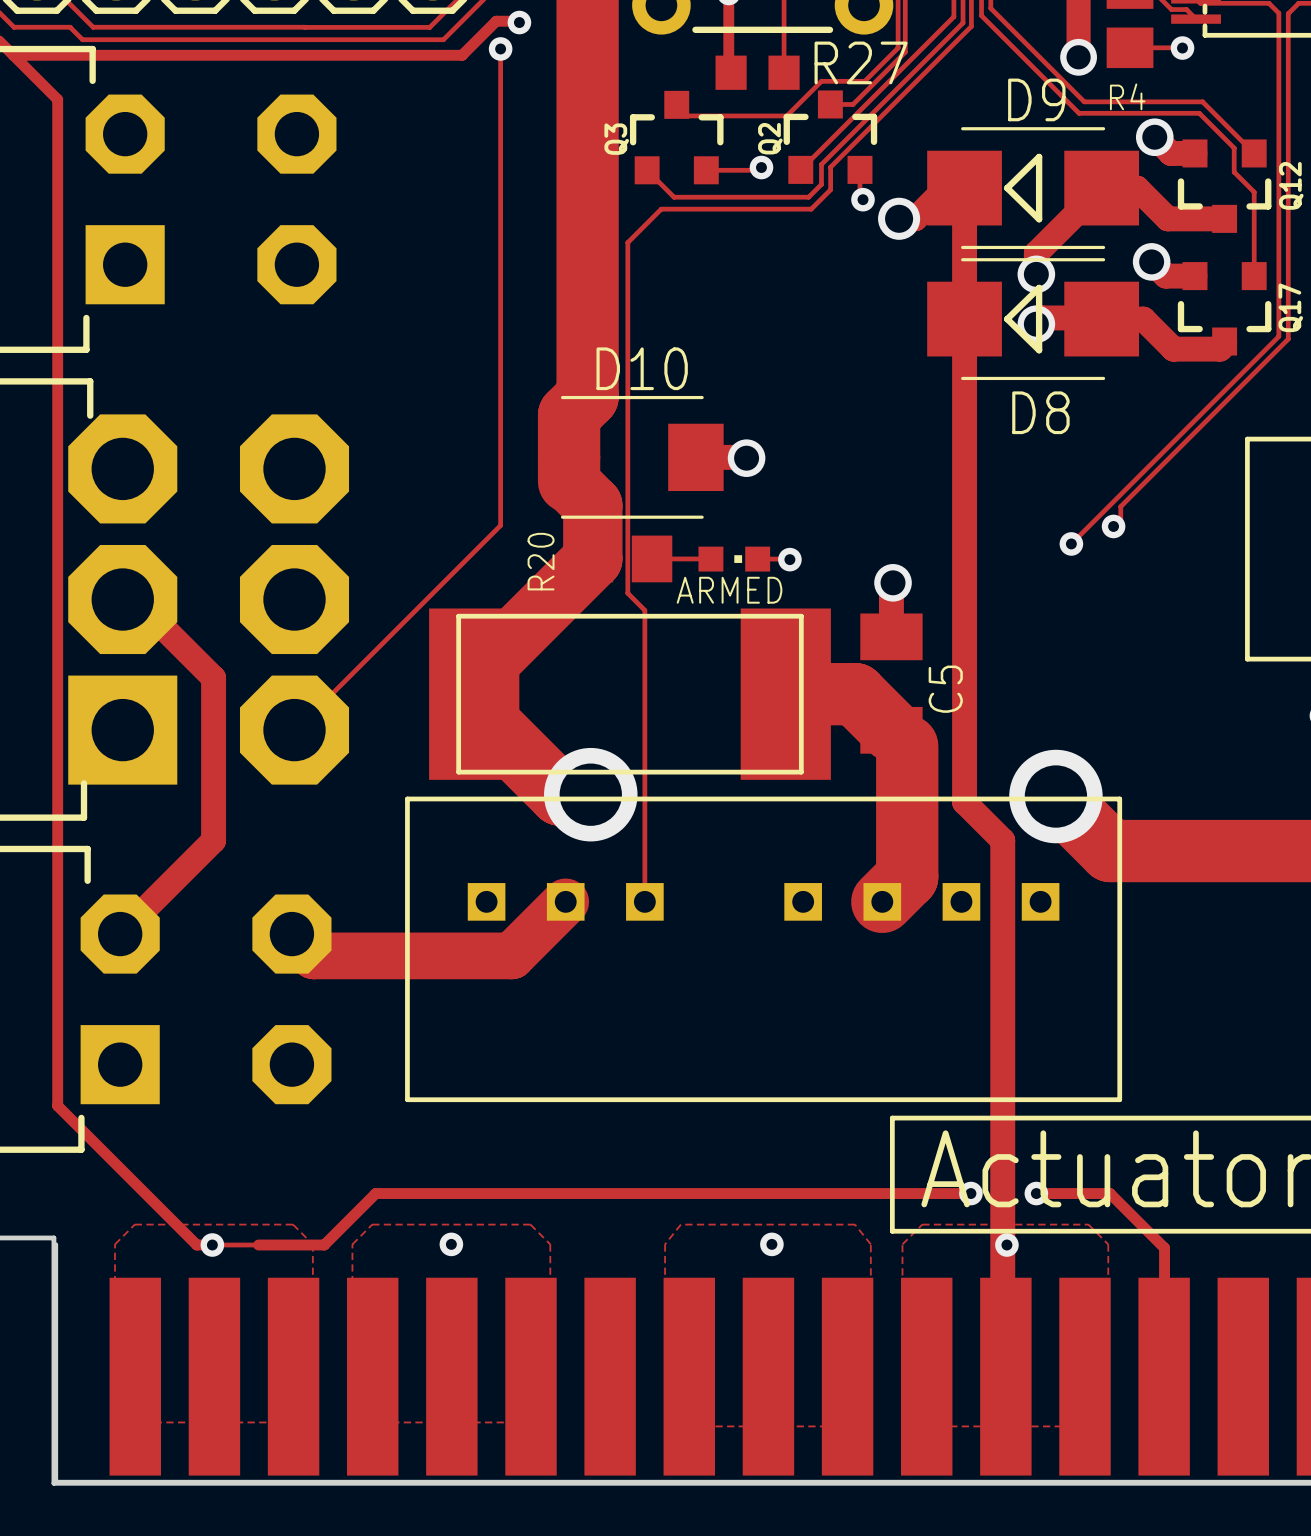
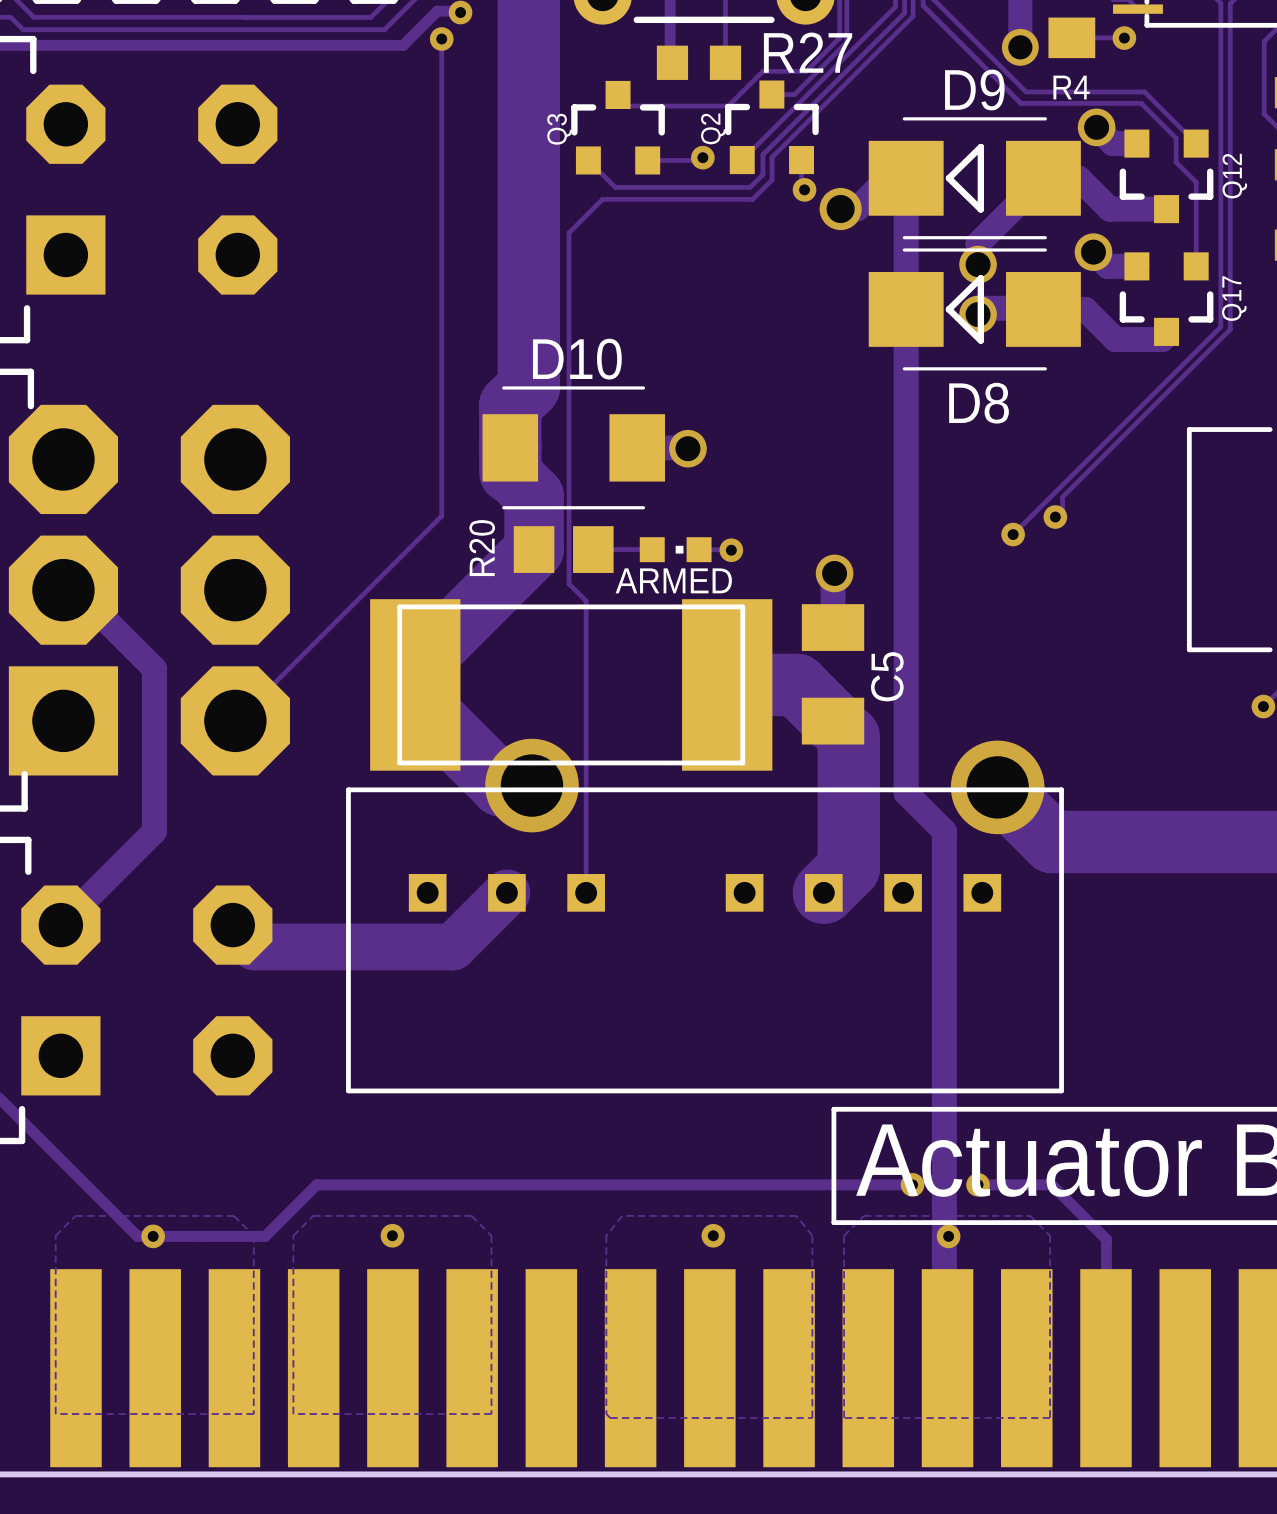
track width: thin (212, 1245) (258, 1245) -> thick (153, 1236) (199, 1236)

